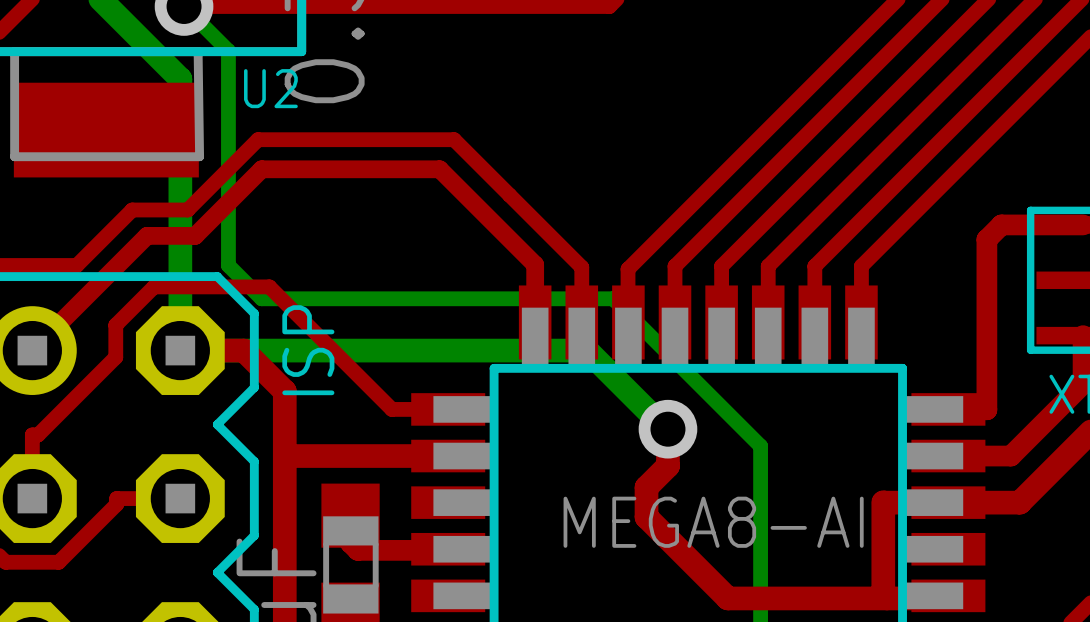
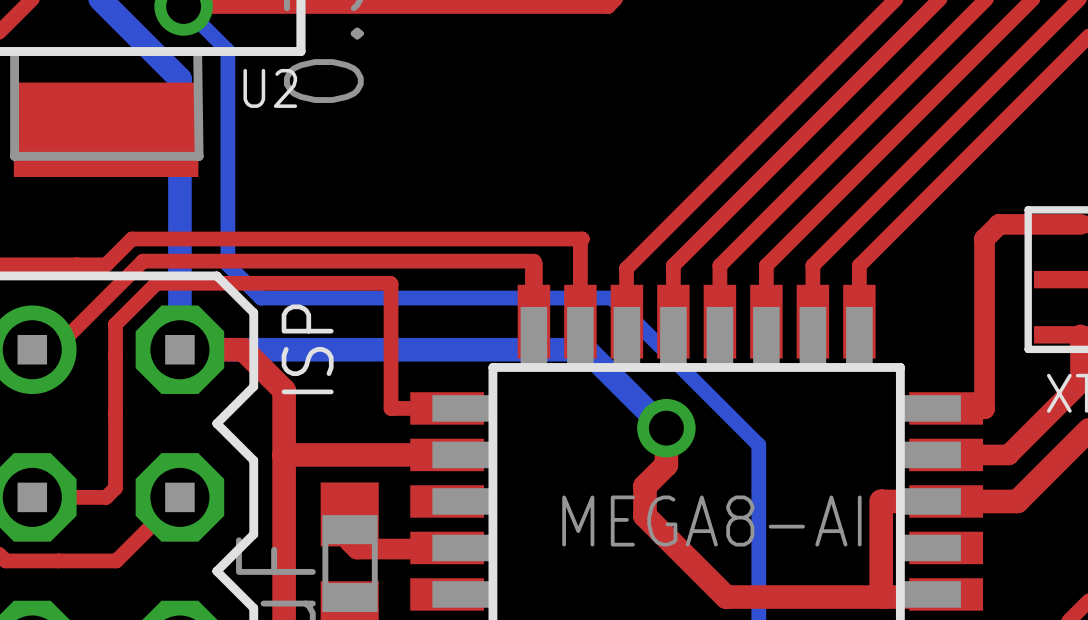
top track: (535, 264) (439, 169) (261, 169) (195, 235) (147, 235) (32, 350) -> (534, 261) (143, 261) (54, 349) (32, 349)
top track: (76, 265) (132, 209) (187, 209) (258, 139) (454, 139) (581, 267) -> (76, 264) (106, 264) (131, 239) (582, 239) (580, 240) (580, 266)
top track: none -> (391, 284) (391, 408)
top track: (154, 286) (269, 286) (391, 409) -> (153, 286) (156, 283) (390, 283)
top track: (115, 357) (38, 434) (32, 434) (32, 498) -> (115, 356) (115, 487) (106, 497) (32, 497)
top track: (180, 498) (116, 498) (116, 504) (58, 562) -> (179, 497) (116, 560) (58, 560)

